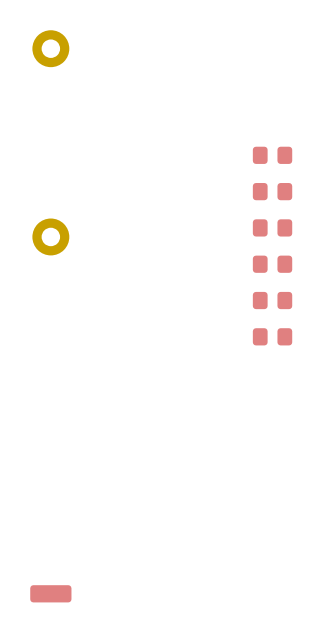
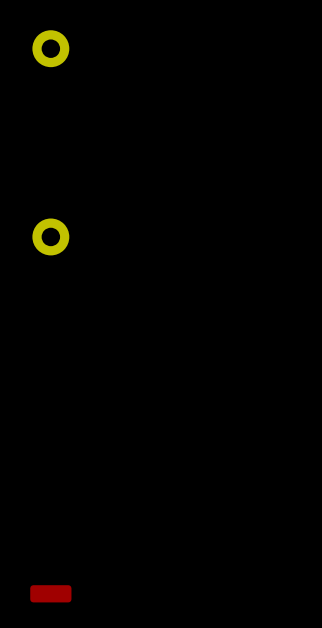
part: (272, 155) -> none
part: (272, 191) -> none
part: (272, 227) -> none
part: (272, 264) -> none
part: (272, 300) -> none
part: (272, 336) -> none

